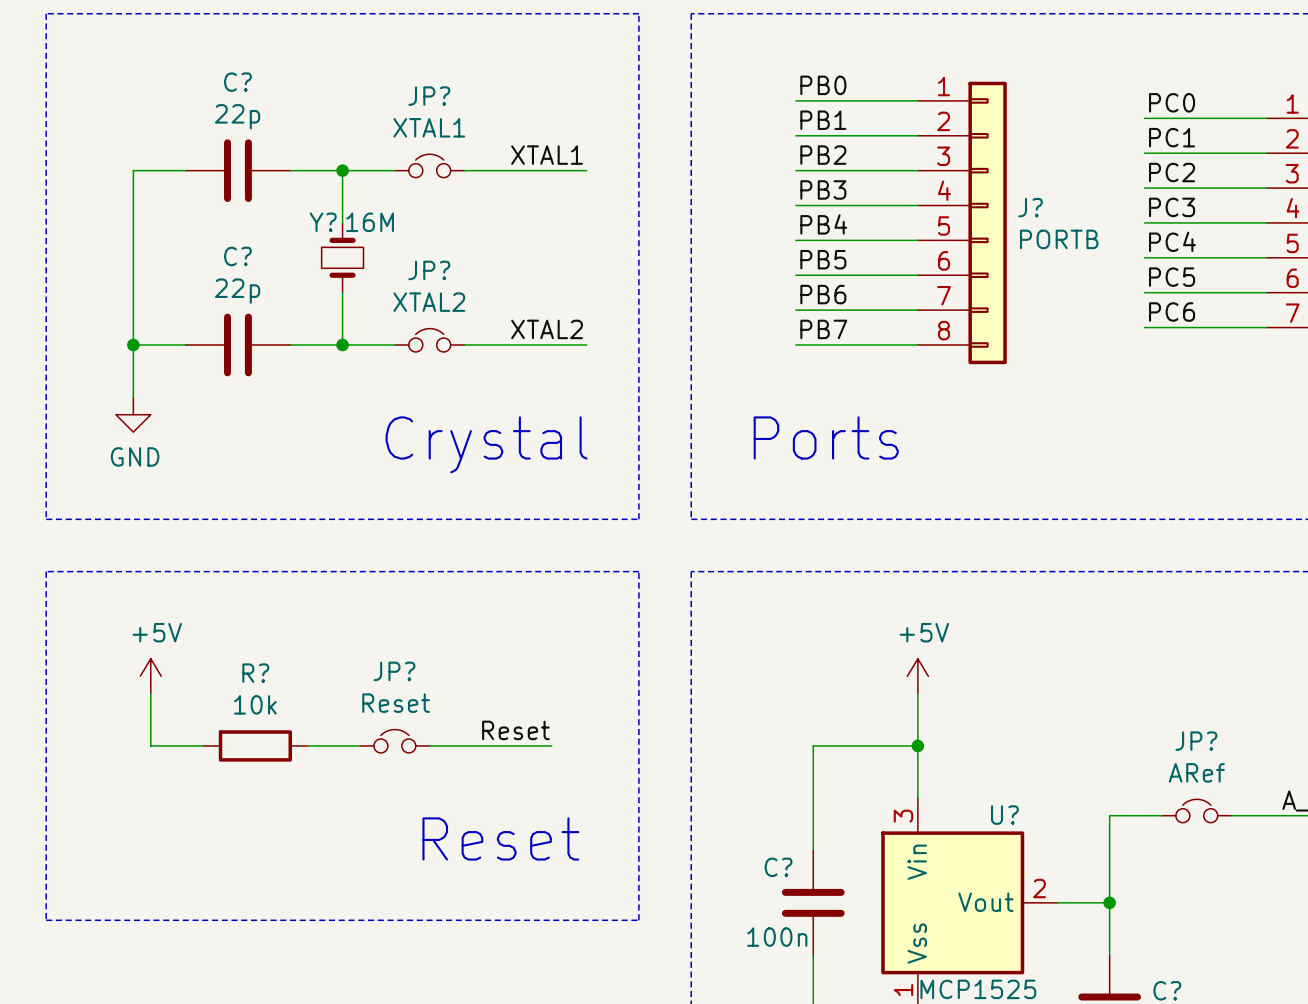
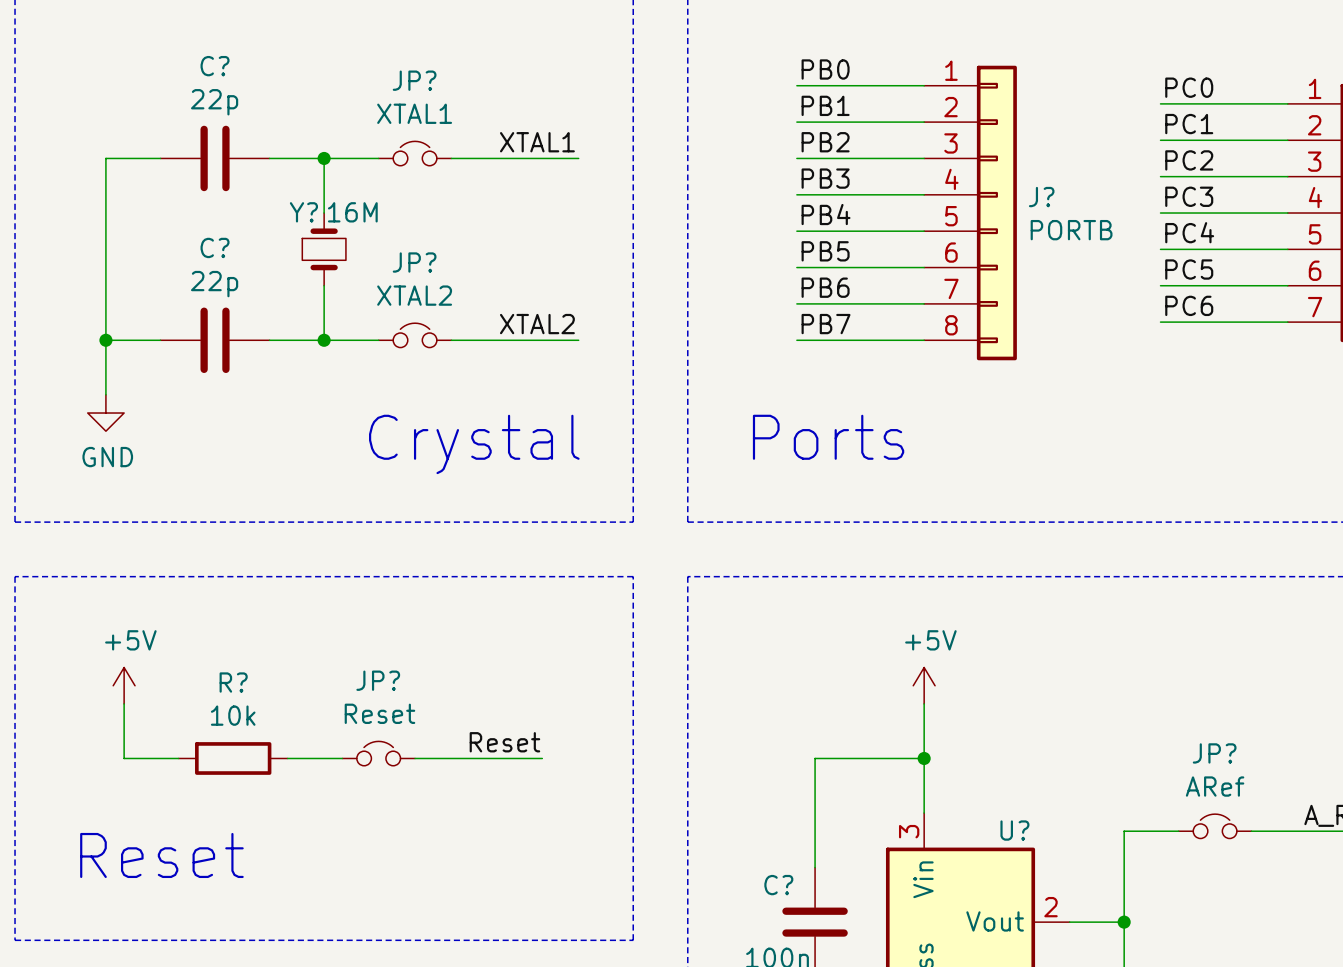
text position: Reset (500, 838) -> Reset (161, 855)

